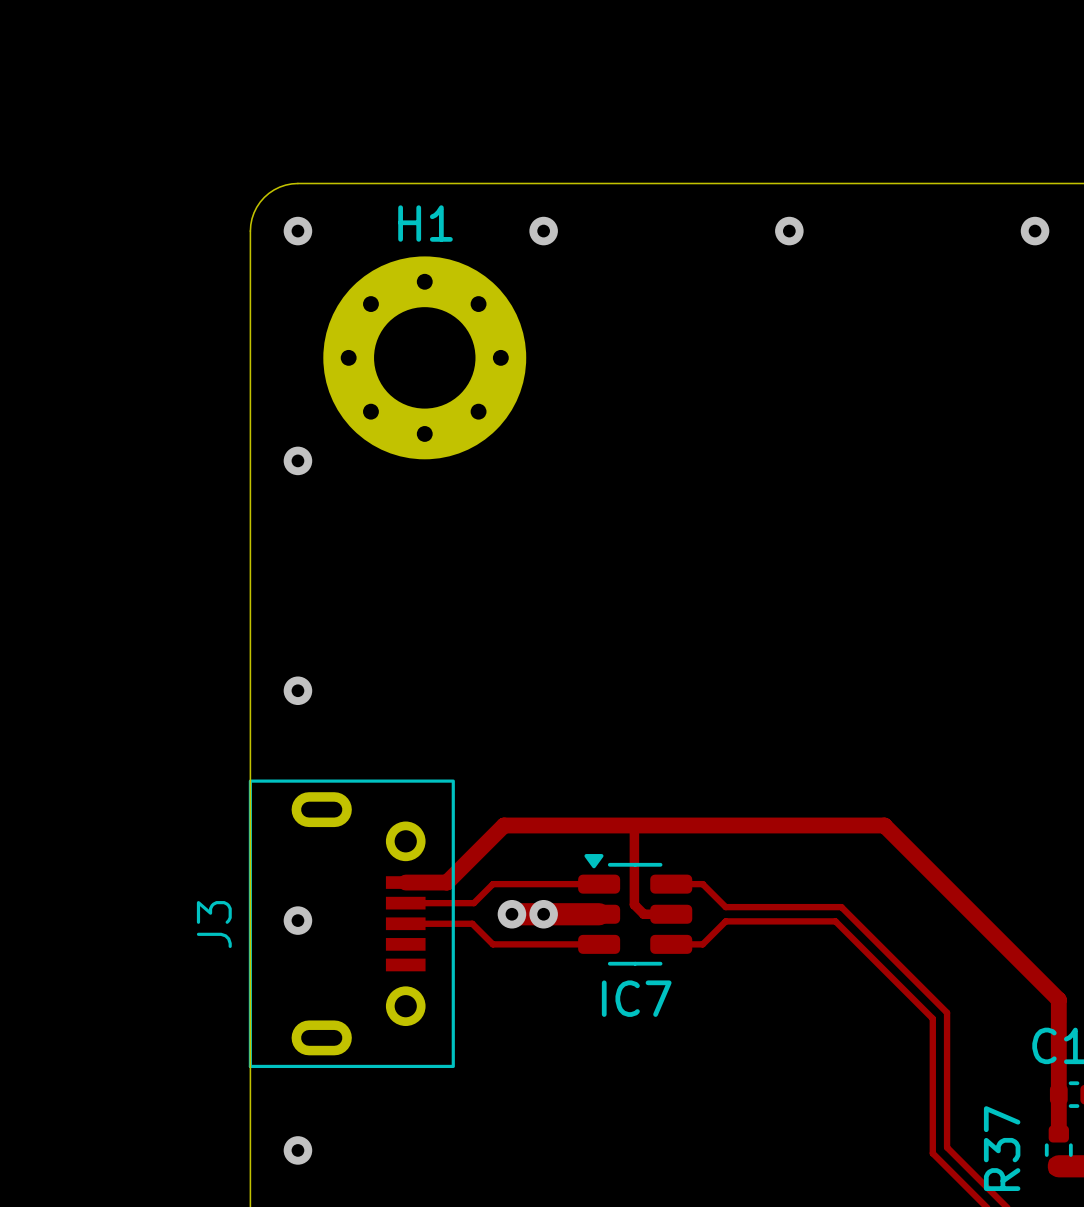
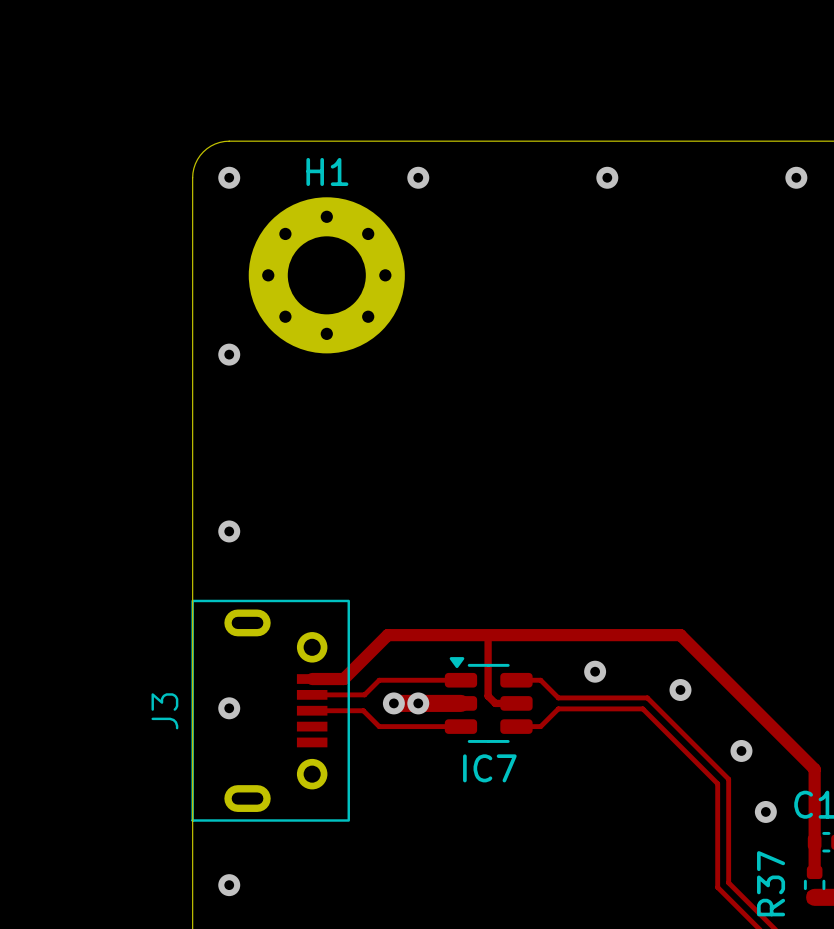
via: none -> (595, 671)
via: none -> (680, 690)
via: none -> (741, 750)
via: none -> (765, 811)

